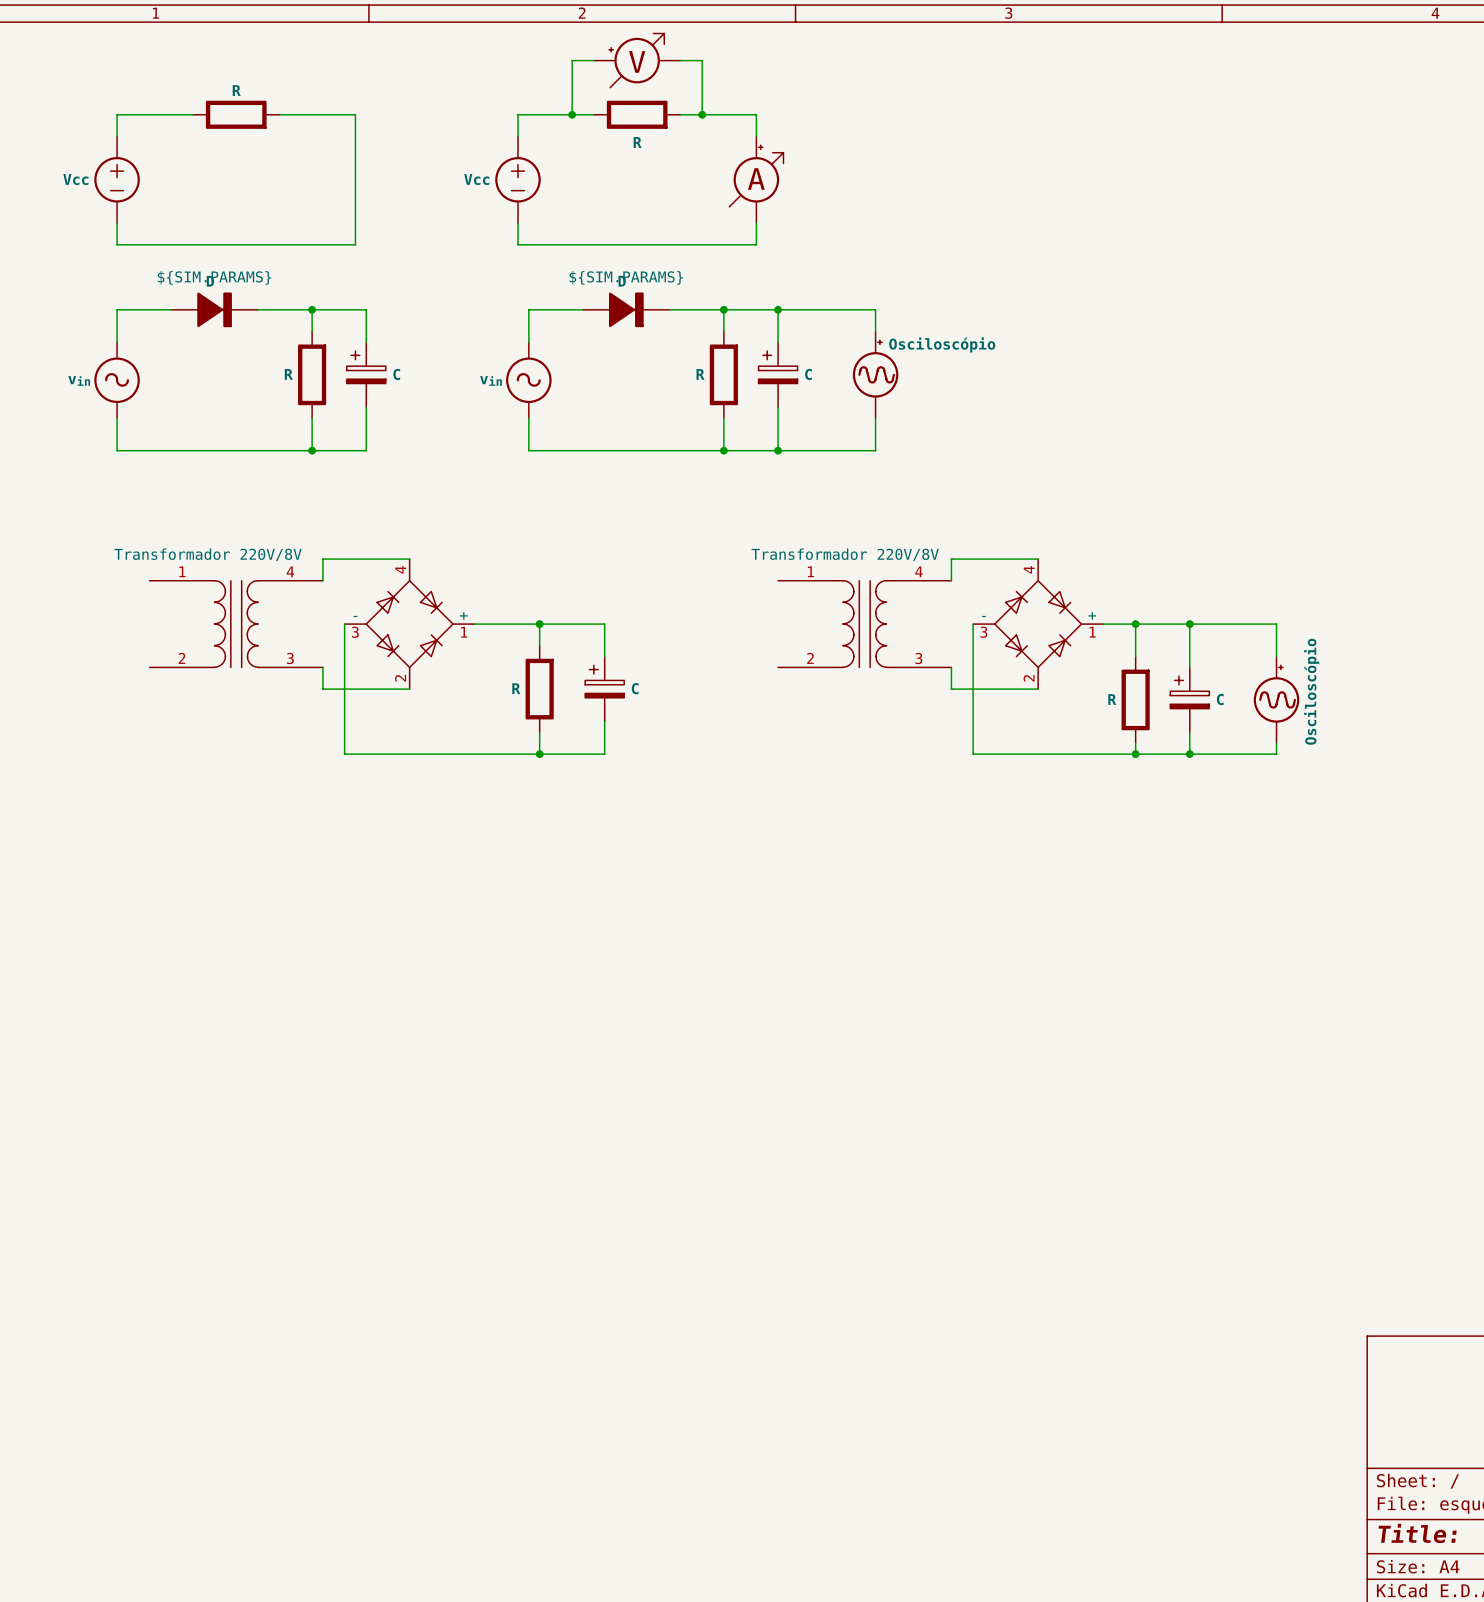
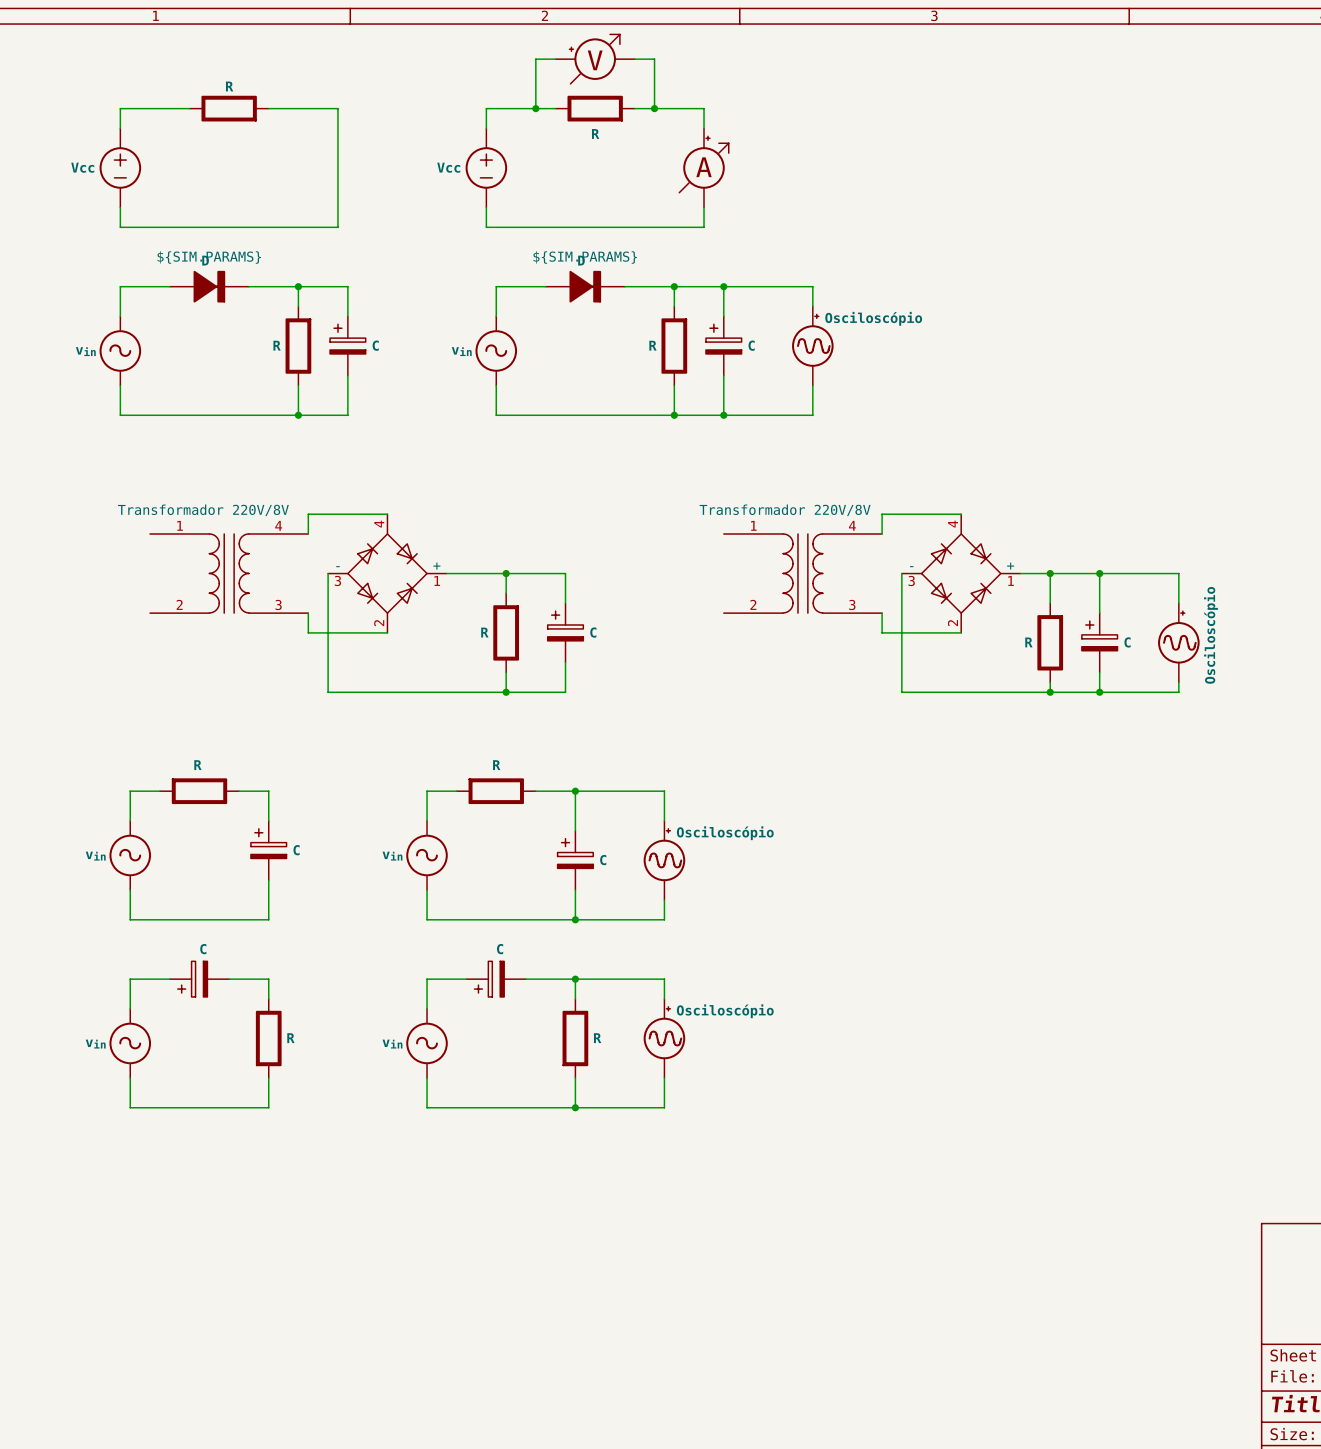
wire: none -> (159, 791) (130, 791) (130, 820)
part: none -> R (199, 791)
wire: none -> (239, 791) (268, 791) (268, 820)
wire: none -> (456, 791) (427, 791) (427, 820)
part: none -> R (496, 791)
wire: none -> (535, 791) (664, 791) (664, 820)
wire: none -> (575, 791) (575, 830)
junction: none -> (575, 791)
C: none -> (268, 850)
power symbol: none -> vin (130, 855)
power symbol: none -> vin (427, 855)
C: none -> (575, 860)
part: none -> Osciloscópio (664, 860)
wire: none -> (268, 880) (268, 919) (130, 919) (130, 890)
wire: none -> (427, 890) (427, 919) (664, 919) (664, 900)
wire: none -> (575, 890) (575, 919)
junction: none -> (575, 919)
wire: none -> (169, 979) (130, 979) (130, 1008)
C: none -> (199, 979)
wire: none -> (229, 979) (268, 979) (268, 998)
wire: none -> (466, 979) (427, 979) (427, 1008)
C: none -> (496, 979)
wire: none -> (525, 979) (664, 979) (664, 998)
wire: none -> (575, 979) (575, 998)
junction: none -> (575, 979)
part: none -> R (268, 1038)
part: none -> R (575, 1038)
part: none -> Osciloscópio (664, 1038)
power symbol: none -> vin (130, 1043)
power symbol: none -> vin (427, 1043)
wire: none -> (130, 1078) (130, 1107) (268, 1107) (268, 1078)
wire: none -> (427, 1078) (427, 1107) (664, 1107) (664, 1078)
wire: none -> (575, 1078) (575, 1107)
junction: none -> (575, 1107)

